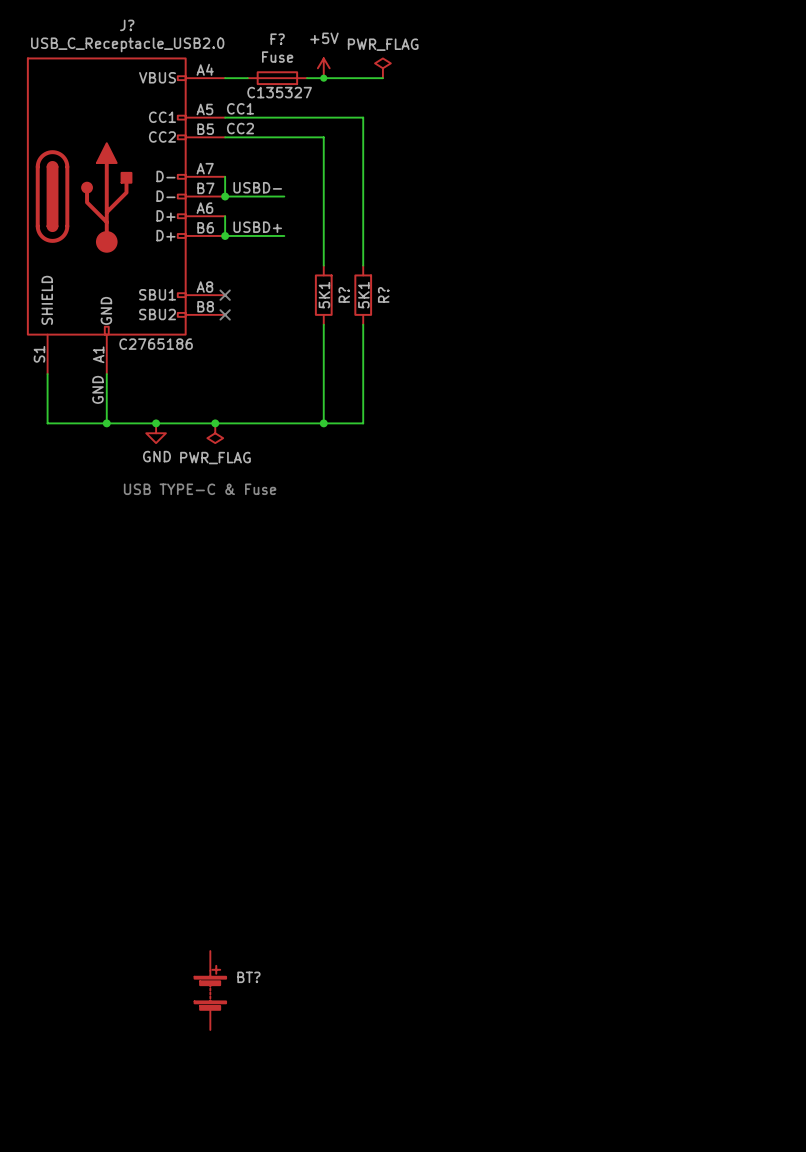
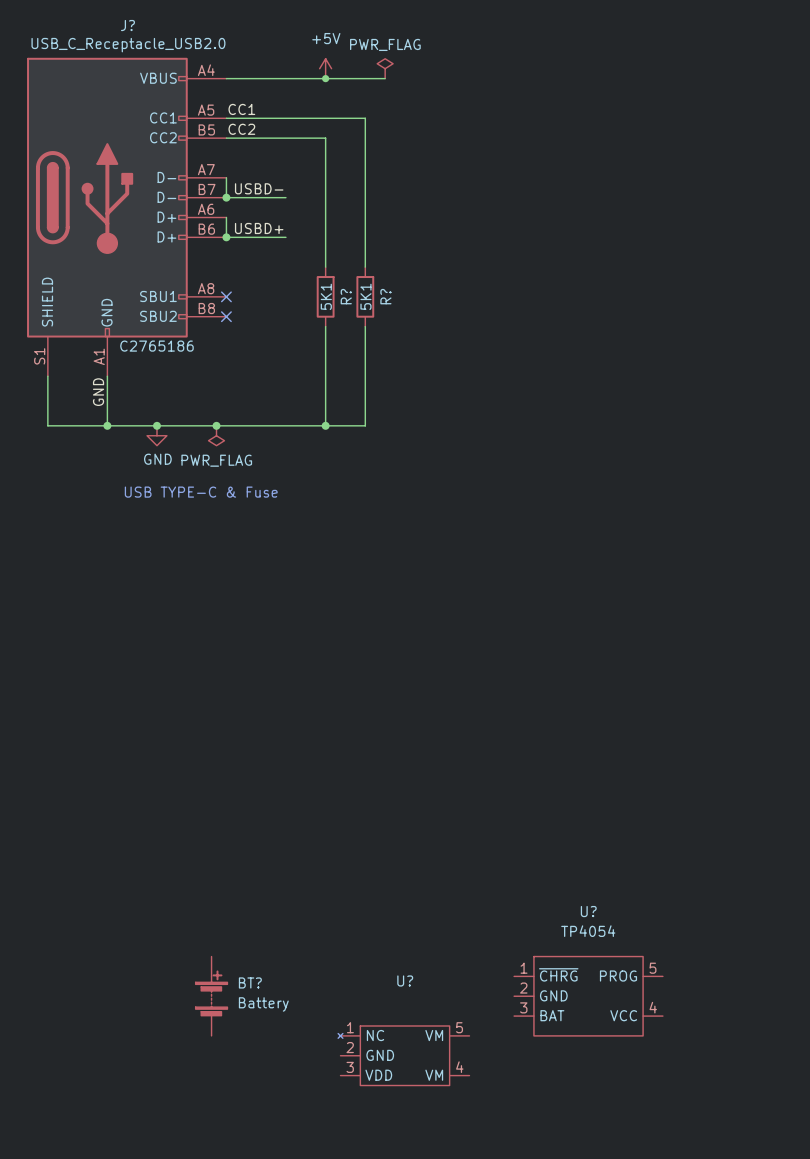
F?: Fuse (277, 78) -> none
U?: none -> TP4054 (588, 996)
BT? value: none -> Battery (263, 1004)
U?: none -> (403, 1055)

